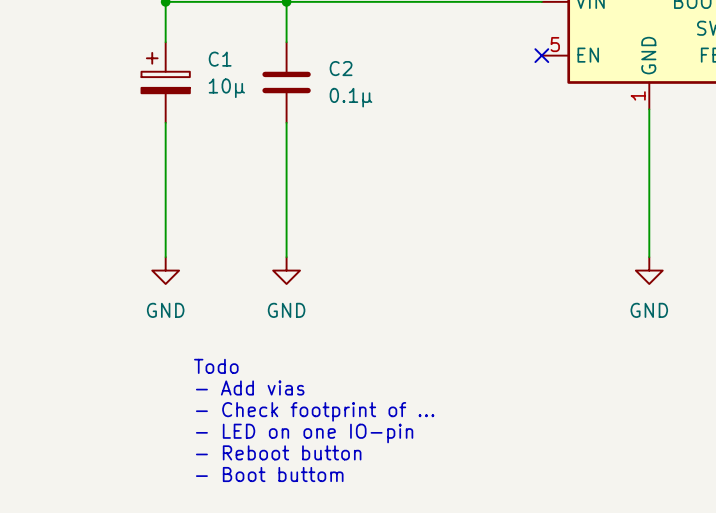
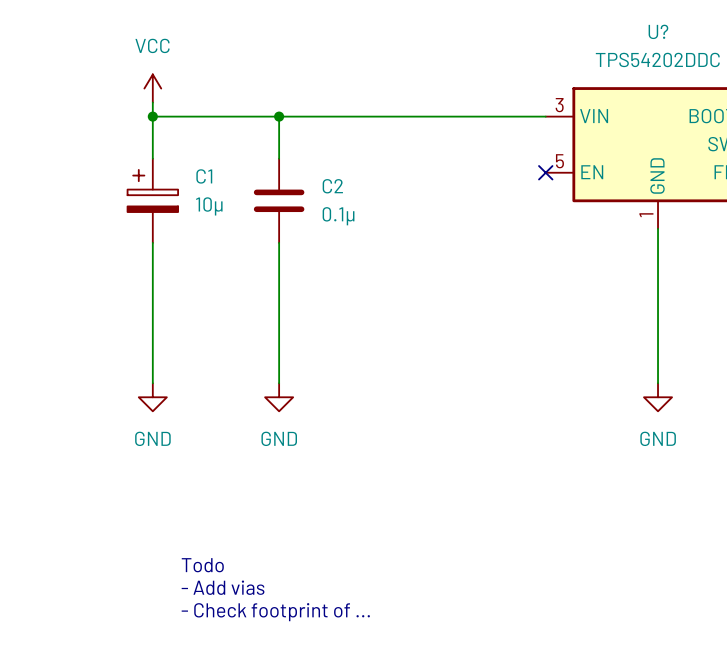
text: Todo (216, 366) -> none
text: - Add vias (250, 387) -> none
text: - Check footprint of ... (315, 411) -> none
text: - LED on one IO-pin (304, 433) -> Todo (202, 565)
text: - Reboot button (278, 452) -> - Add vias (223, 587)
text: - Boot buttom (269, 474) -> - Check footprint of ... (275, 612)

